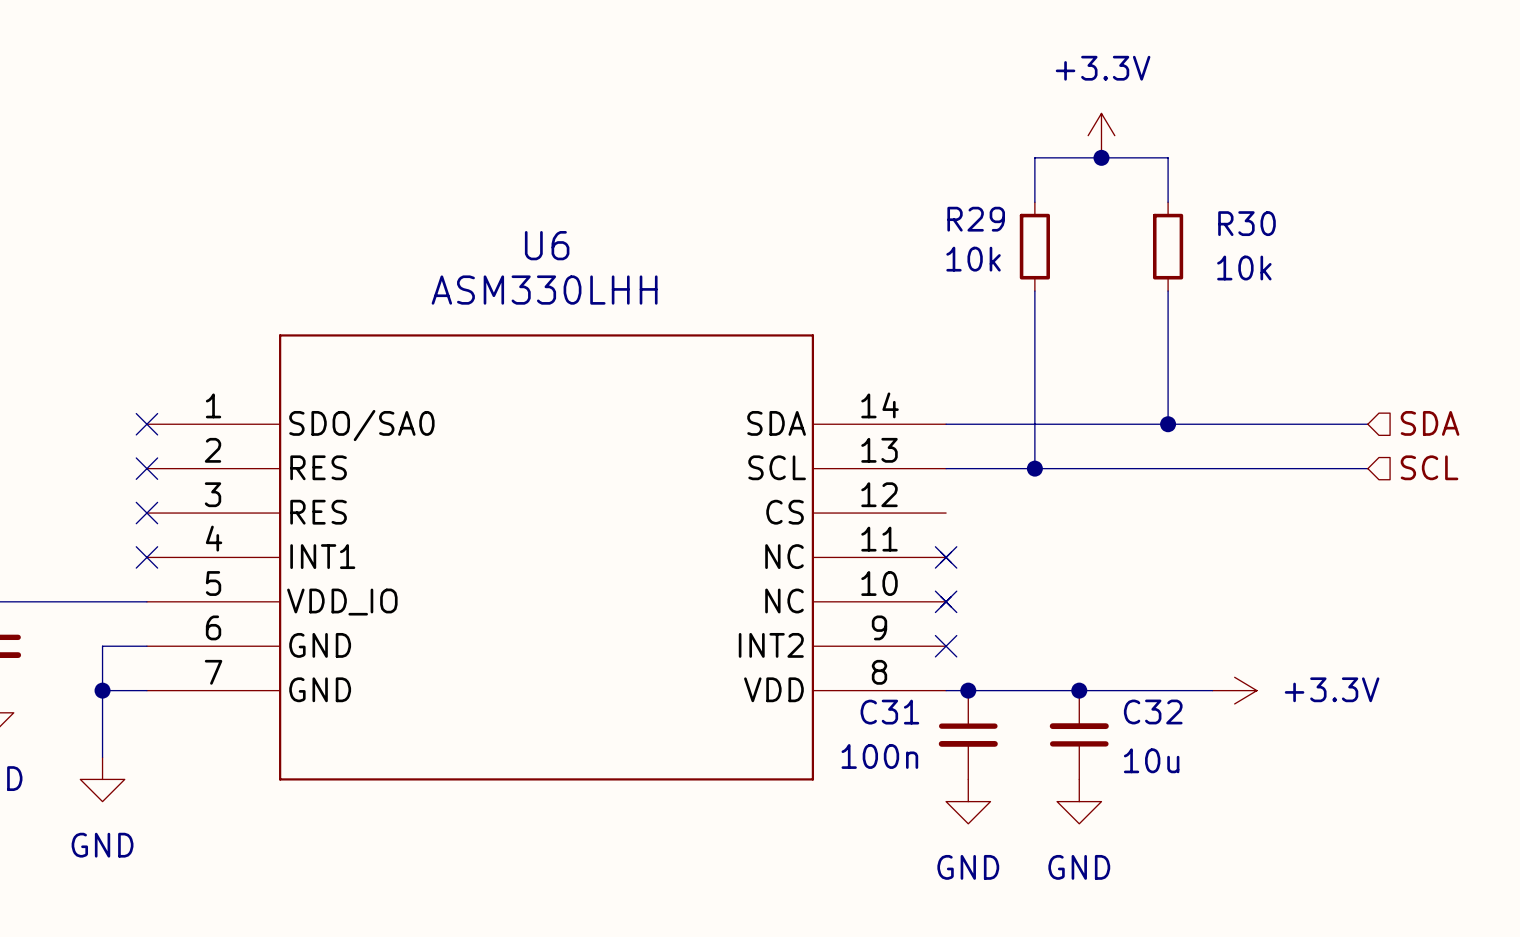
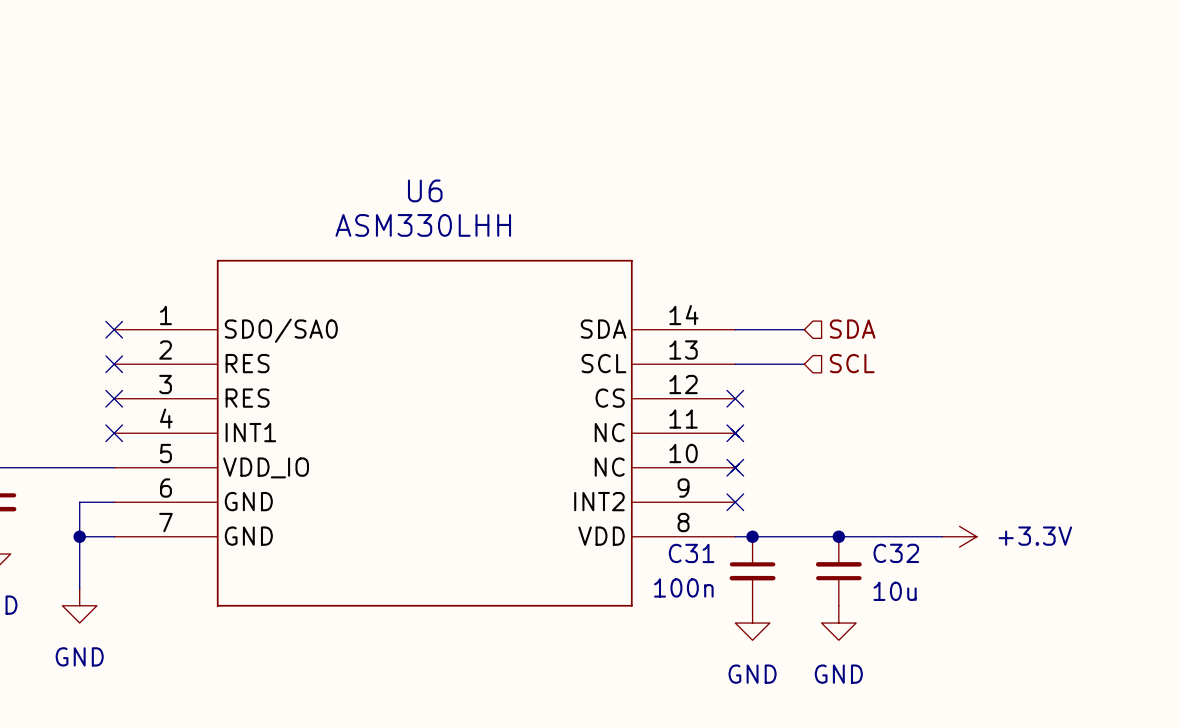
power symbol: +3.3V (1101, 135) -> none
junction: (1101, 157) -> none
wire: (1034, 202) (1034, 157) (1168, 157) (1168, 202) -> none
R29: 10k (1034, 246) -> none
R30: 10k (1168, 246) -> none
wire: (1034, 291) (1034, 468) (1367, 468) -> none
wire: (1168, 291) (1168, 424) -> none
hierarchical label position: SDA (1430, 423) -> SDA (852, 329)
wire: (1034, 424) (1367, 424) -> none
junction: (1168, 424) -> none
hierarchical label position: SCL (1429, 467) -> SCL (852, 363)
junction: (1034, 468) -> none
no-connect mark: none -> (735, 398)

